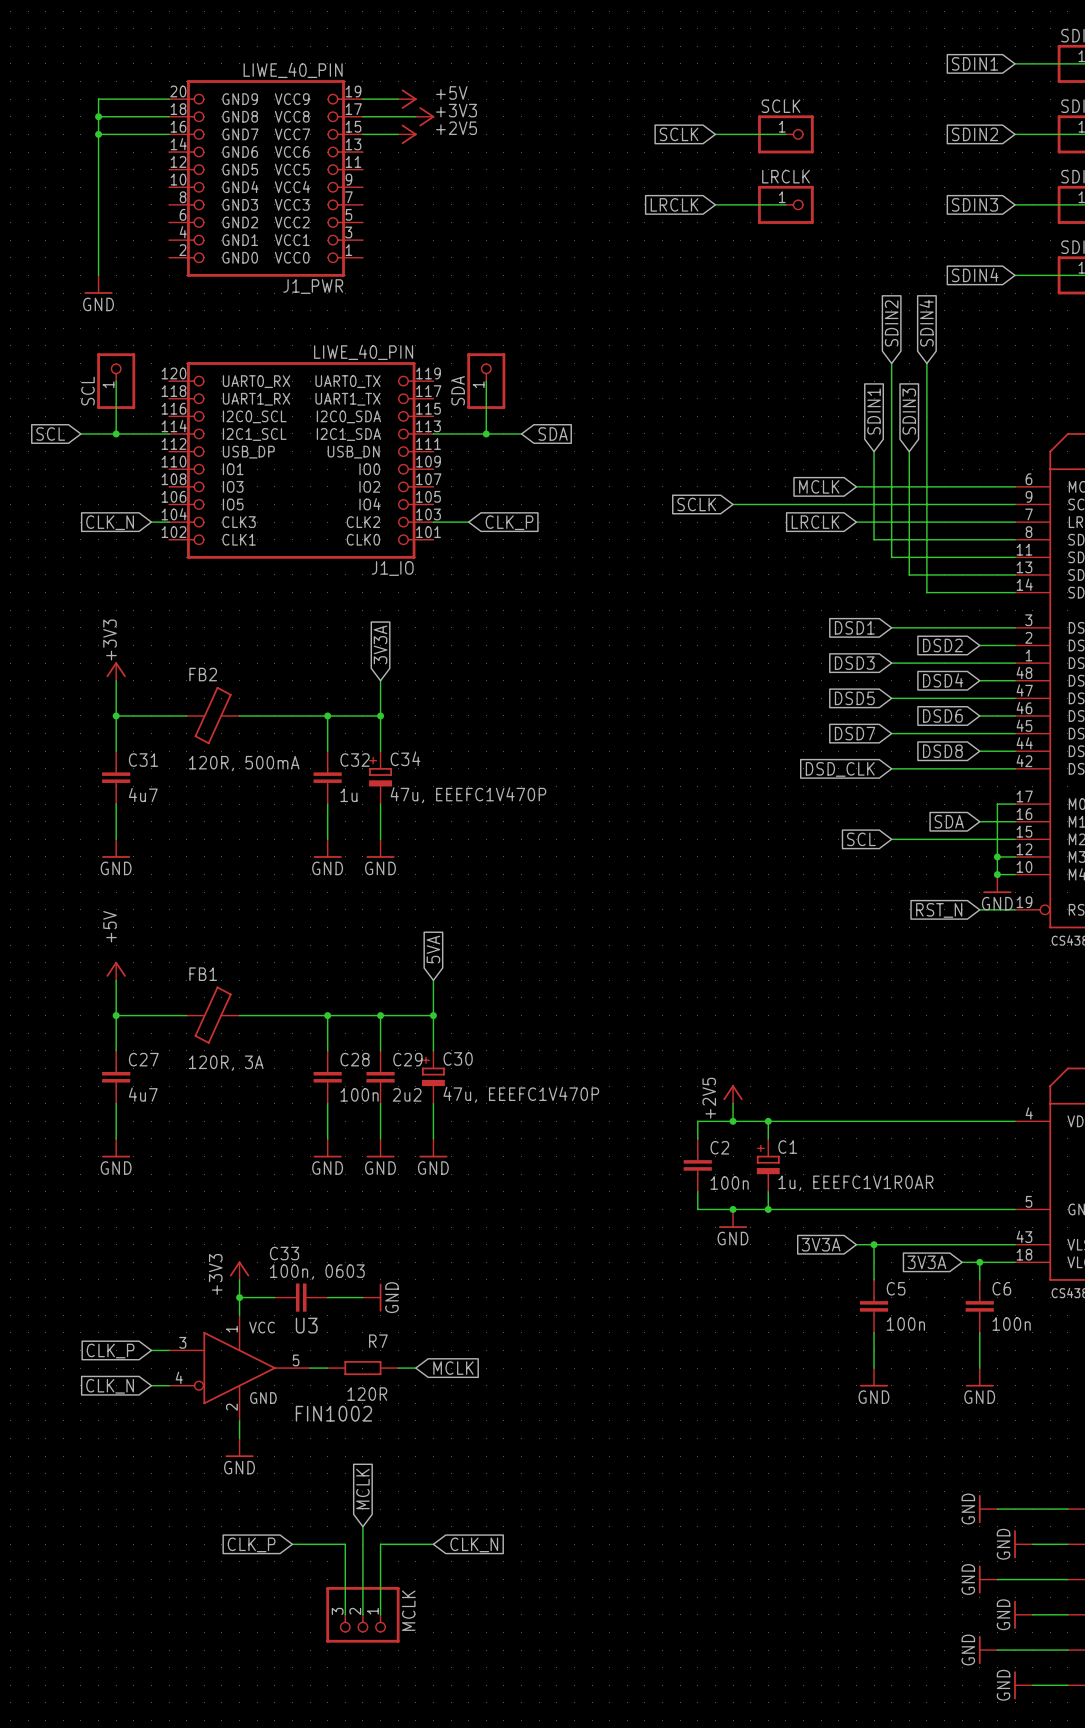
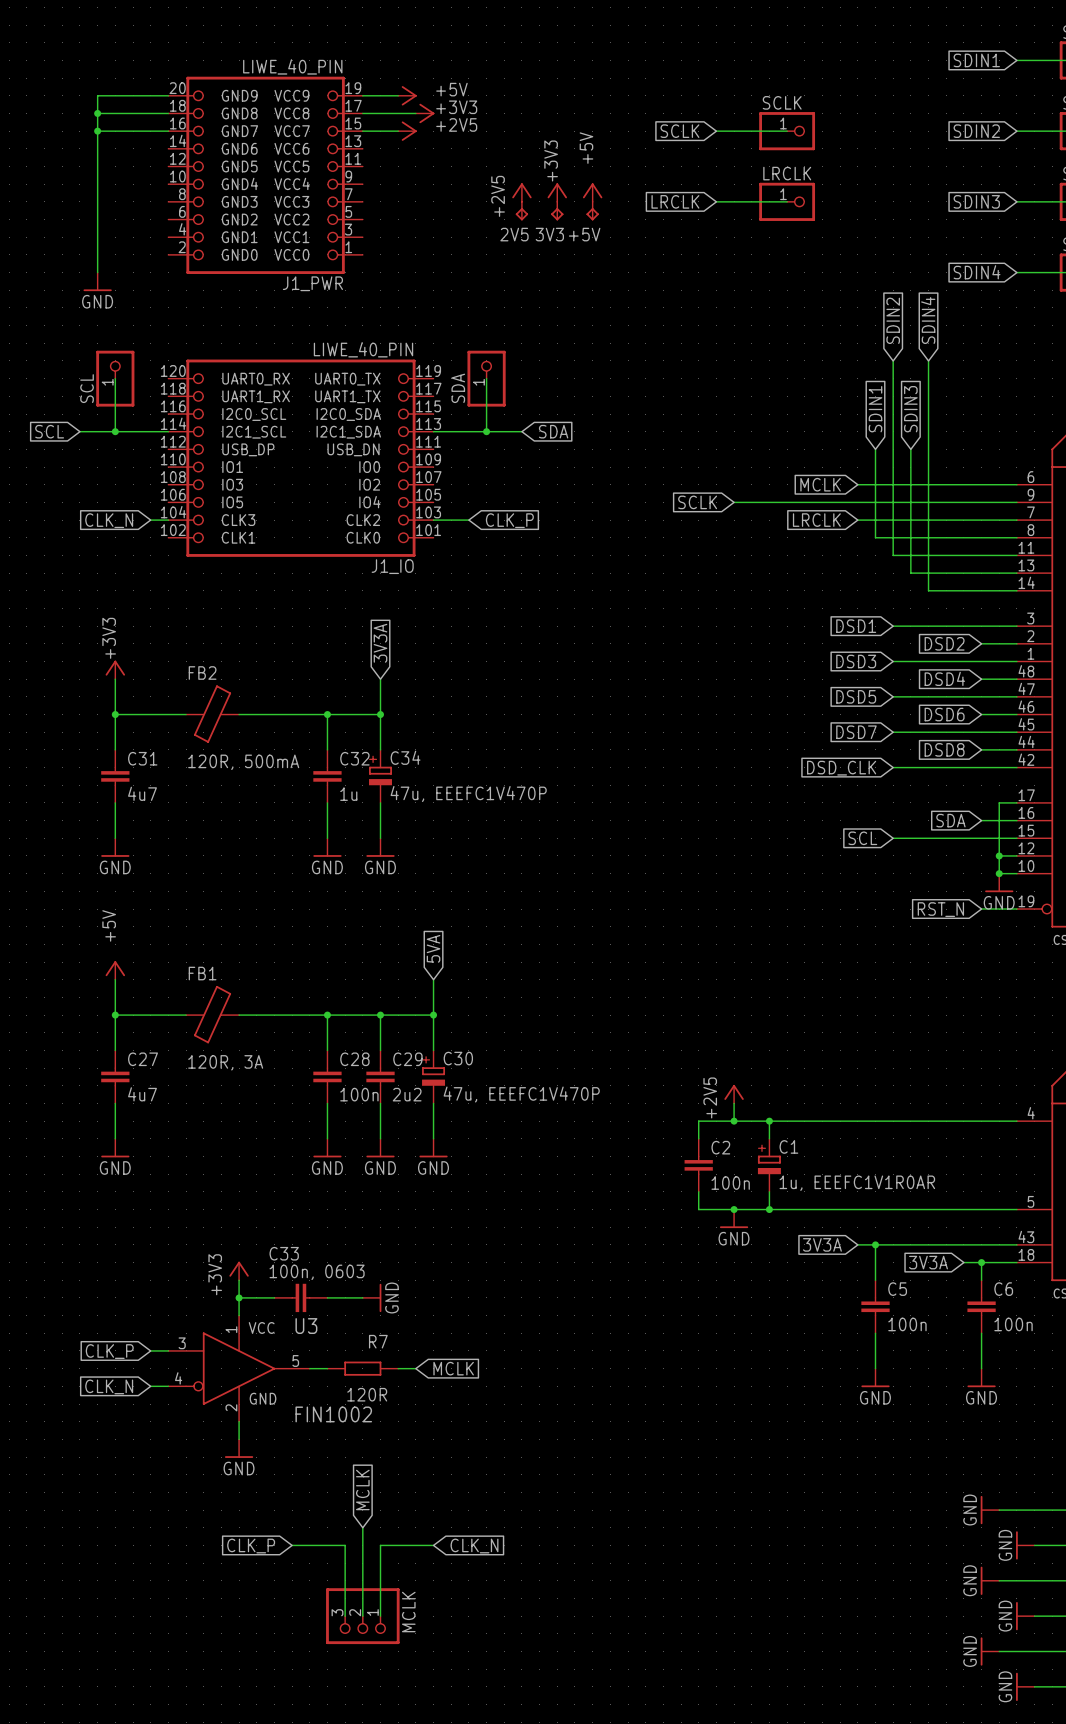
power symbol: none -> +2V5 (521, 192)
power symbol: none -> +3V3 (557, 192)
power symbol: none -> +5V (592, 192)
2V5: none -> (521, 211)
3V3: none -> (557, 211)
+5V: none -> (592, 211)

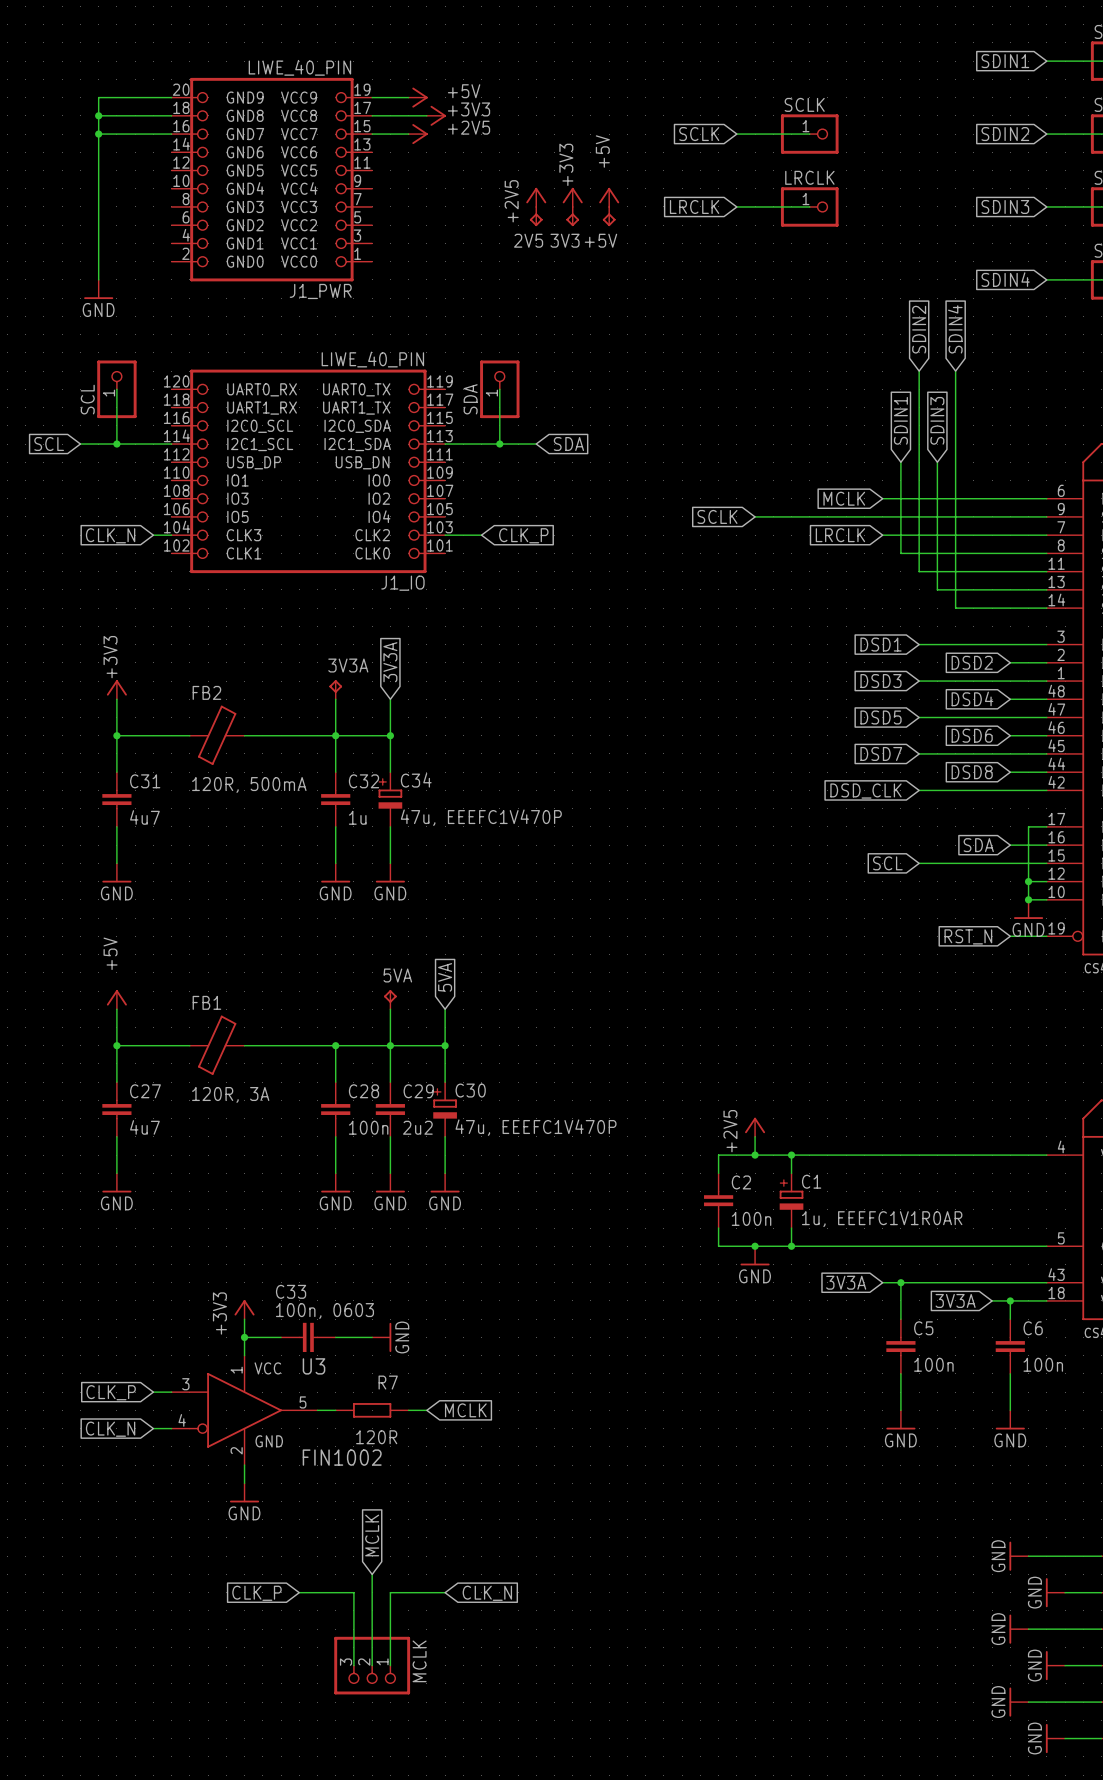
3V3A: none -> (335, 689)
wire: none -> (335, 699) (335, 735)
5VA: none -> (390, 999)
wire: none -> (390, 1009) (390, 1045)

